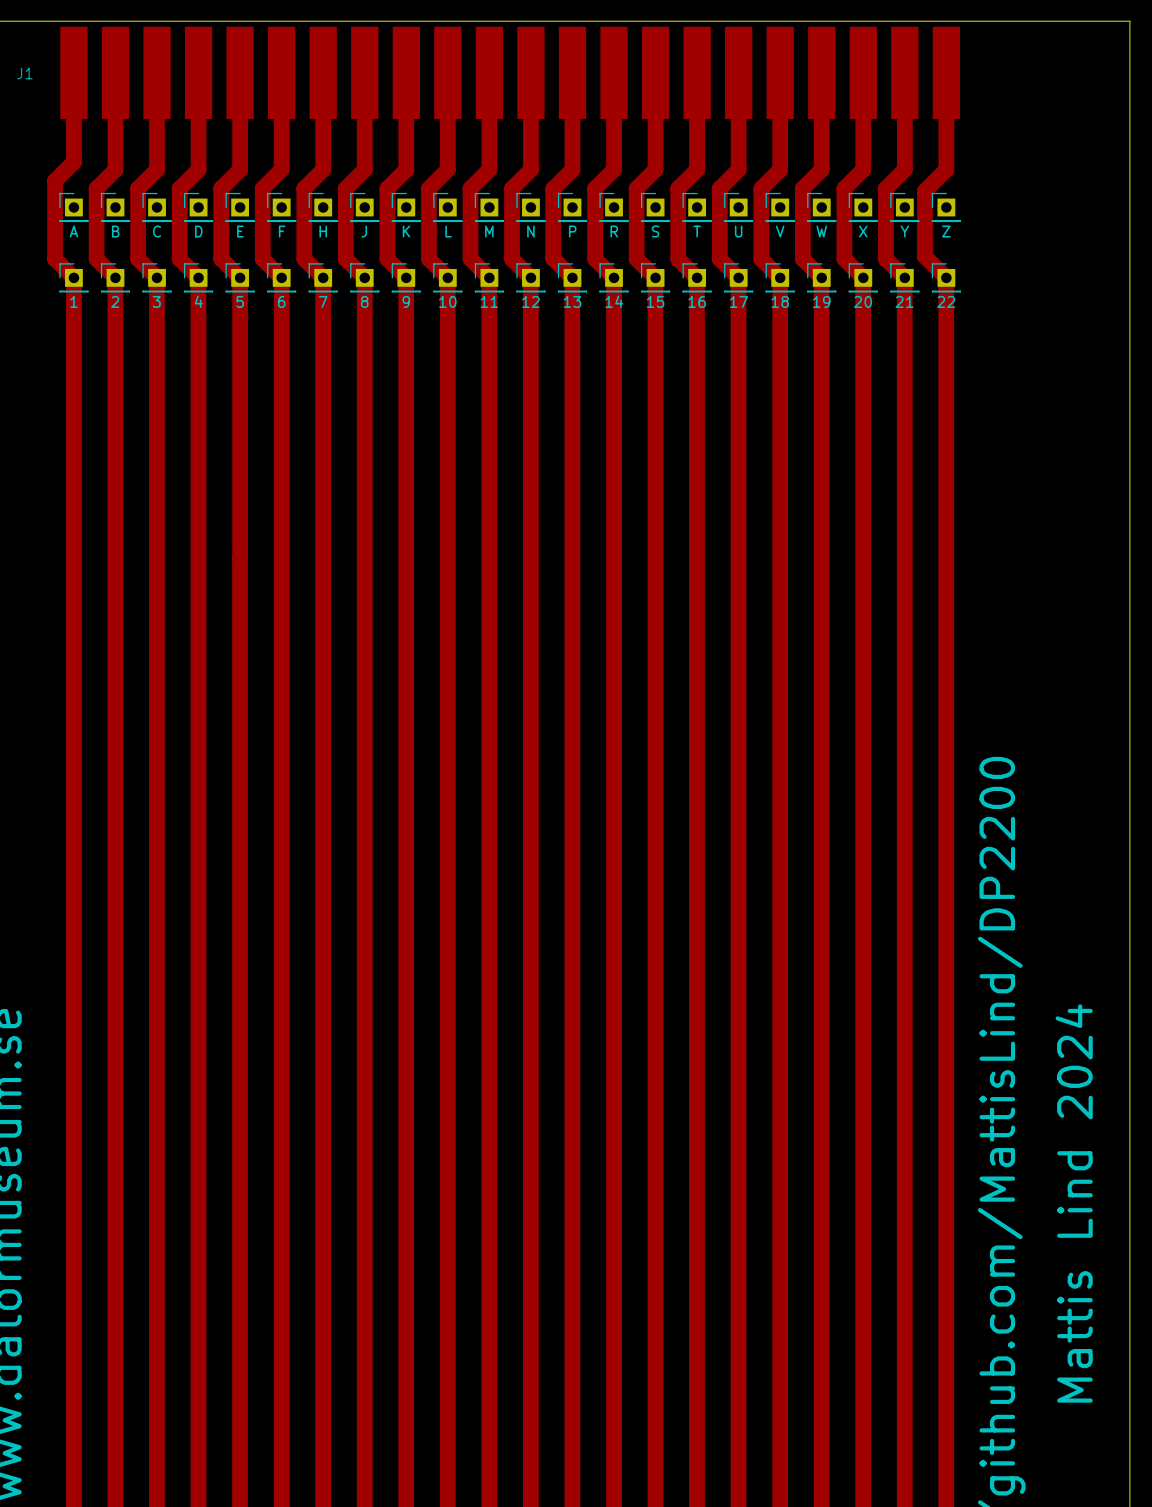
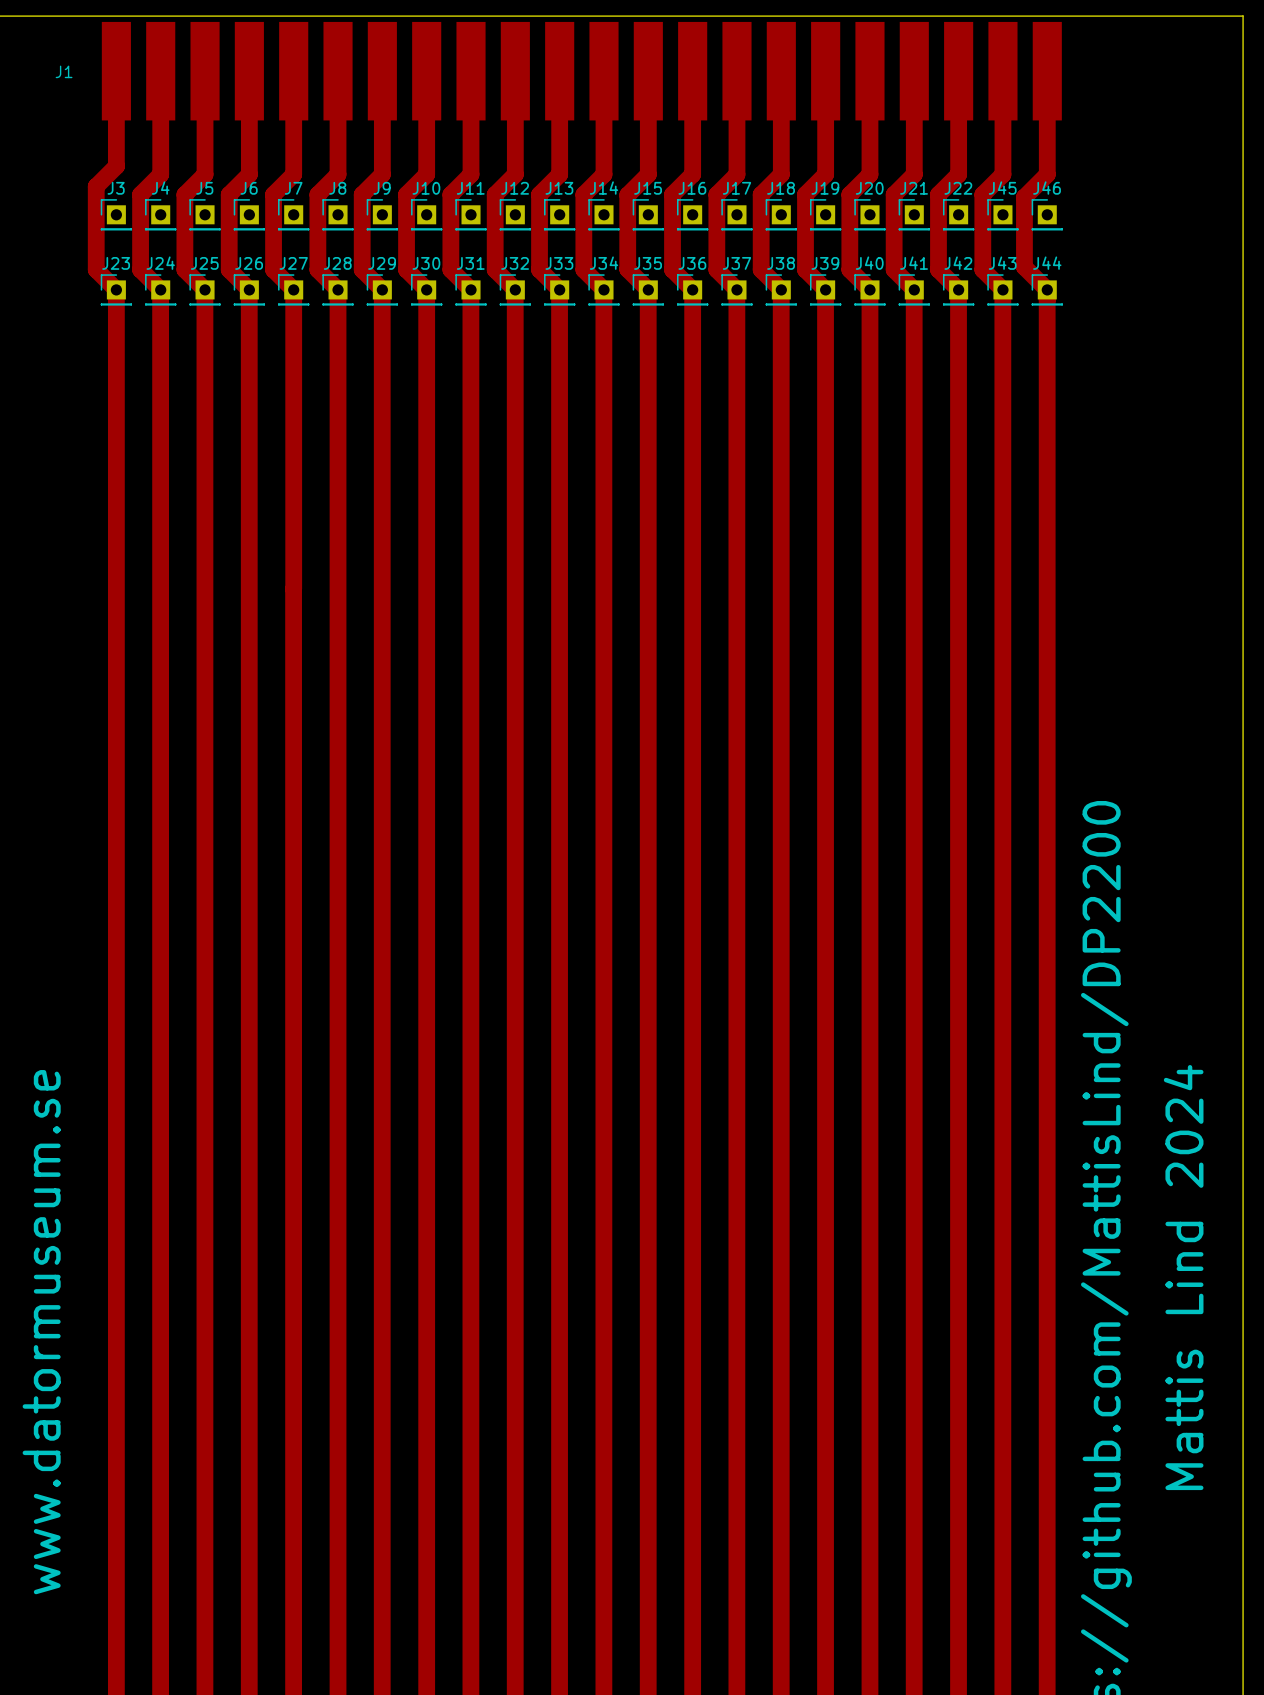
J3 name: none -> J3 (116, 188)
J4 name: none -> J4 (160, 188)
J5 name: none -> J5 (204, 188)
J6 name: none -> J6 (249, 188)
J7 name: none -> J7 (293, 188)
J8 name: none -> J8 (337, 188)
J9 name: none -> J9 (382, 188)
J10 name: none -> J10 (426, 188)
J11 name: none -> J11 (470, 188)
J12 name: none -> J12 (515, 188)
J13 name: none -> J13 (559, 188)
J14 name: none -> J14 (604, 188)
J15 name: none -> J15 (648, 188)
J16 name: none -> J16 (692, 188)
J17 name: none -> J17 (736, 188)
J18 name: none -> J18 (781, 188)
J19 name: none -> J19 (825, 188)
J20 name: none -> J20 (869, 188)
J21 name: none -> J21 (914, 188)
J22 name: none -> J22 (958, 188)
J45 name: none -> J45 (1002, 188)
J46 name: none -> J46 (1047, 188)
J3 value: A (73, 231) -> none
J4 value: B (115, 231) -> none
J5 value: C (157, 231) -> none
J6 value: D (198, 231) -> none
J7 value: E (240, 231) -> none
J8 value: F (282, 231) -> none
J9 value: H (323, 231) -> none
J10 value: J (364, 231) -> none
J11 value: K (406, 231) -> none
J12 value: L (448, 231) -> none
J13 value: M (489, 231) -> none
J14 value: N (530, 231) -> none
J15 value: P (572, 231) -> none
J16 value: R (614, 231) -> none
J17 value: S (655, 231) -> none
J18 value: T (697, 231) -> none
J19 value: U (738, 231) -> none
J20 value: V (780, 231) -> none
J21 value: W (821, 231) -> none
J22 value: X (863, 231) -> none
J45 value: Y (904, 231) -> none
J46 value: Z (946, 231) -> none
J24 name: none -> J24 (160, 263)
J34 name: none -> J34 (604, 263)
J40 name: none -> J40 (869, 263)
J41 name: none -> J41 (914, 263)
J42 name: none -> J42 (958, 263)
J43 name: none -> J43 (1002, 263)
J44 name: none -> J44 (1047, 263)
J23 name: none -> J23 (116, 263)
J25 name: none -> J25 (204, 263)
J26 name: none -> J26 (249, 263)
J27 name: none -> J27 (293, 263)
J28 name: none -> J28 (337, 263)
J29 name: none -> J29 (382, 263)
J30 name: none -> J30 (426, 263)
J31 name: none -> J31 (470, 263)
J32 name: none -> J32 (515, 263)
J33 name: none -> J33 (559, 263)
J35 name: none -> J35 (648, 263)
J36 name: none -> J36 (692, 263)
J37 name: none -> J37 (736, 263)
J38 name: none -> J38 (781, 263)
J39 name: none -> J39 (825, 263)
J23 value: 1 (73, 301) -> none
J24 value: 2 (115, 301) -> none
J25 value: 3 (156, 301) -> none
J26 value: 4 (198, 301) -> none
J27 value: 5 (240, 301) -> none
J28 value: 6 (281, 301) -> none
J29 value: 7 (323, 301) -> none
J30 value: 8 (364, 301) -> none
J31 value: 9 (406, 301) -> none
J32 value: 10 (447, 301) -> none
J33 value: 11 (489, 301) -> none
J34 value: 12 (530, 301) -> none
J35 value: 13 (572, 301) -> none
J36 value: 14 (614, 301) -> none
J37 value: 15 (655, 301) -> none
J38 value: 16 (697, 301) -> none
J39 value: 17 (738, 301) -> none
J40 value: 18 (780, 301) -> none
J41 value: 19 (821, 301) -> none
J42 value: 20 (863, 301) -> none
J43 value: 21 (904, 301) -> none
J44 value: 22 (946, 301) -> none

